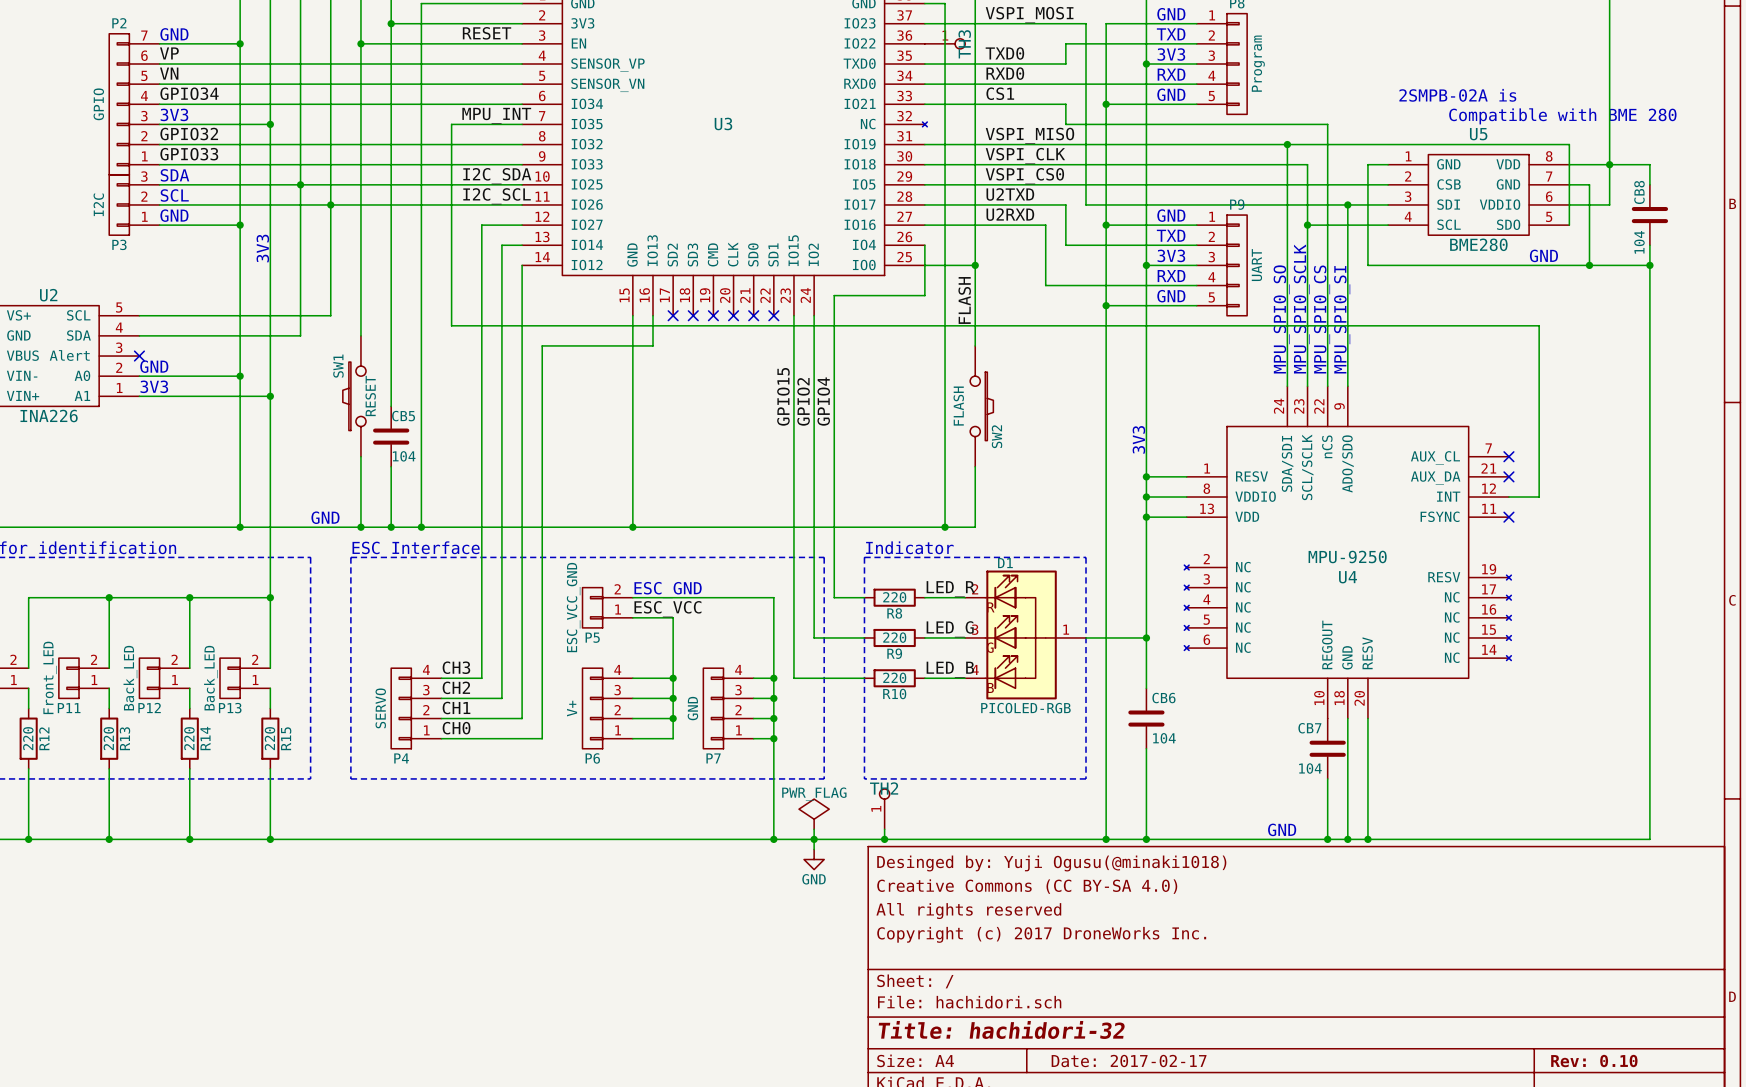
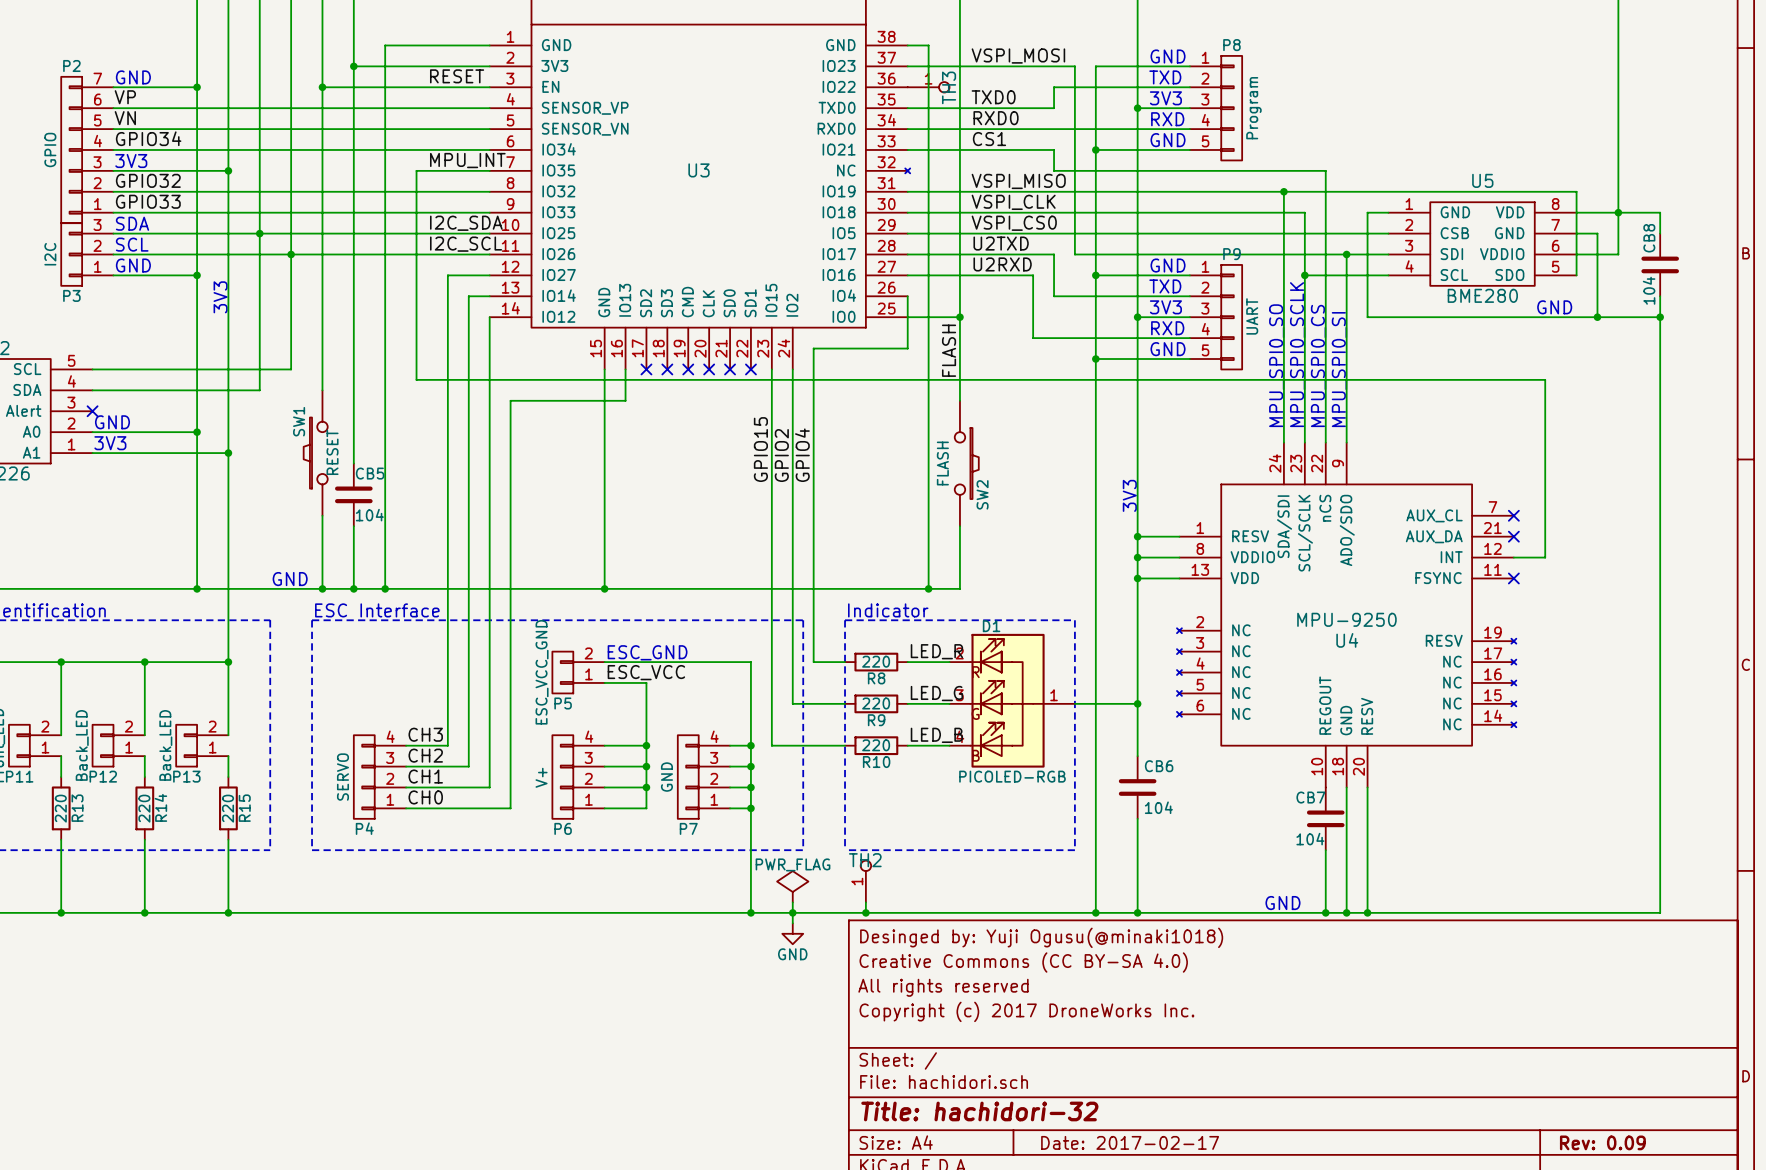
text: 2SMPB-02A is (1457, 95) -> none
text: Compatible with BME 280 (1562, 116) -> none
title block: Rev: 0.10 (1594, 1061) -> Rev: 0.09 (1602, 1142)

